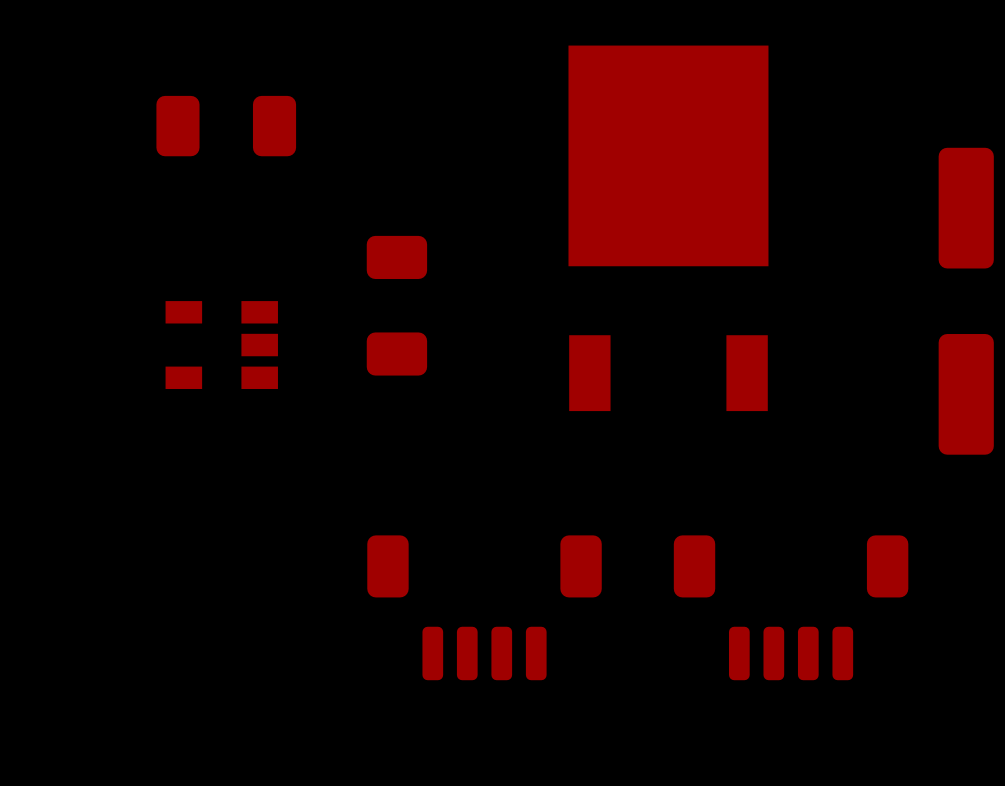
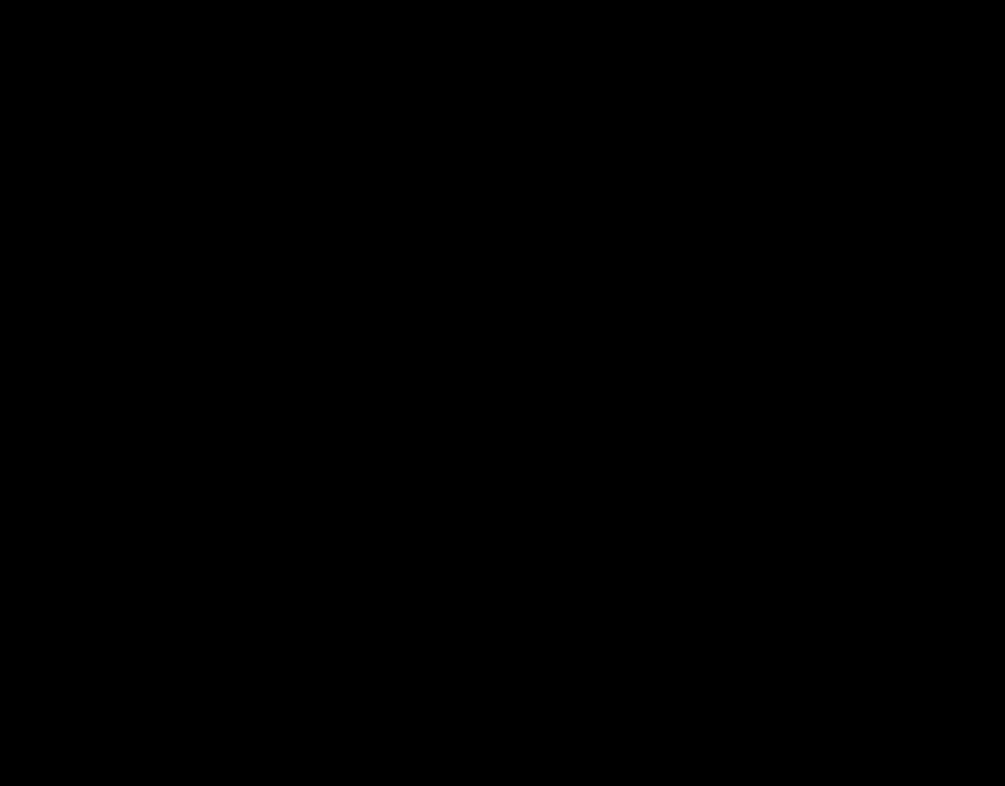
part: (226, 126) -> none
part: (668, 228) -> none
part: (966, 301) -> none
part: (396, 305) -> none
part: (221, 345) -> none
part: (484, 607) -> none
part: (791, 607) -> none

